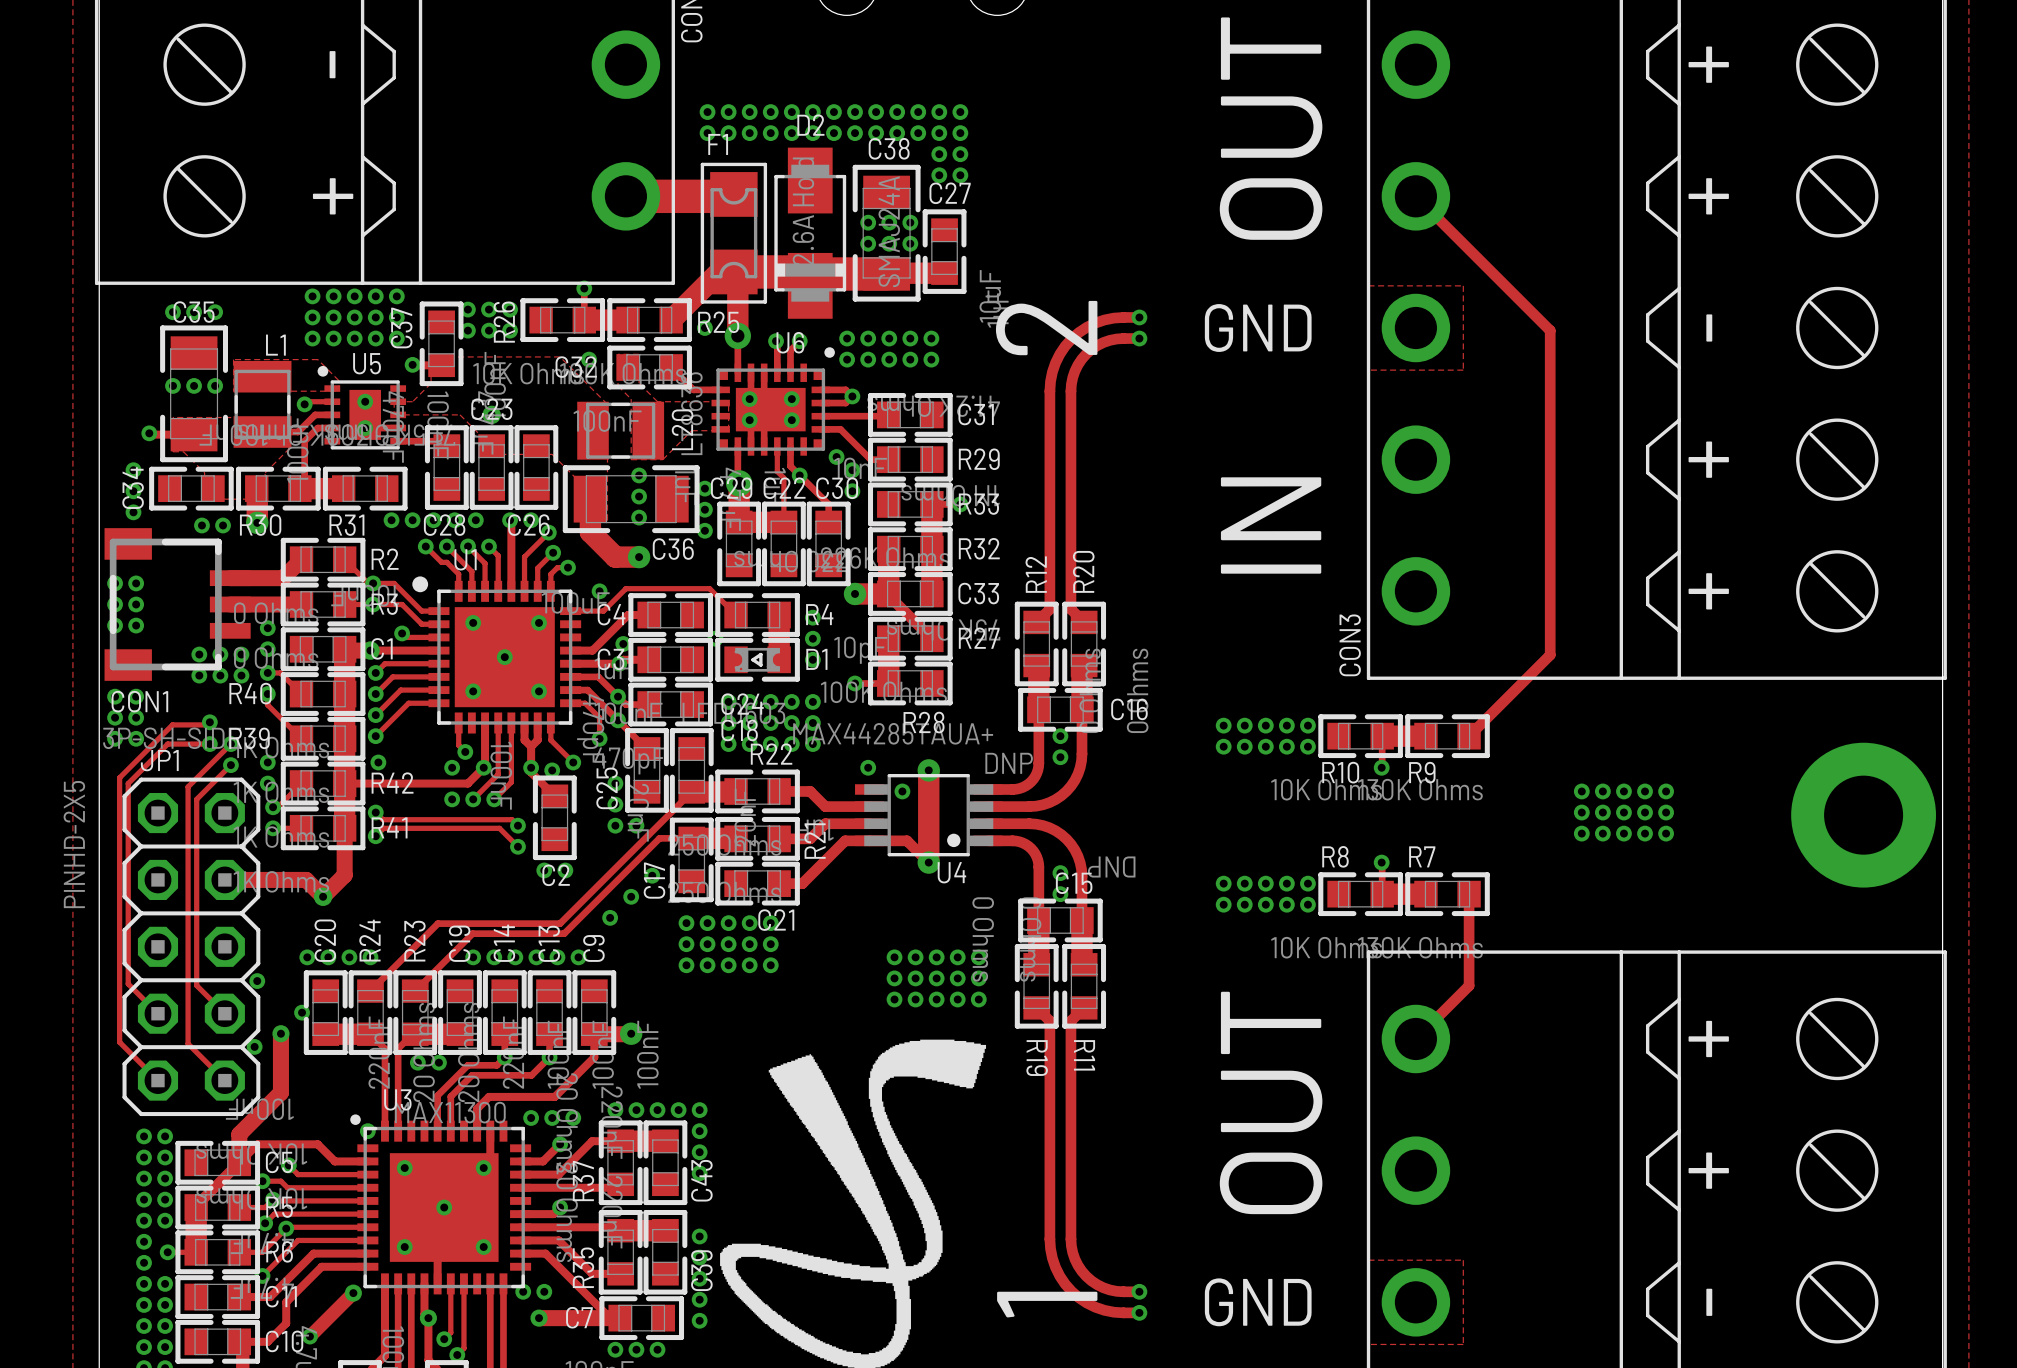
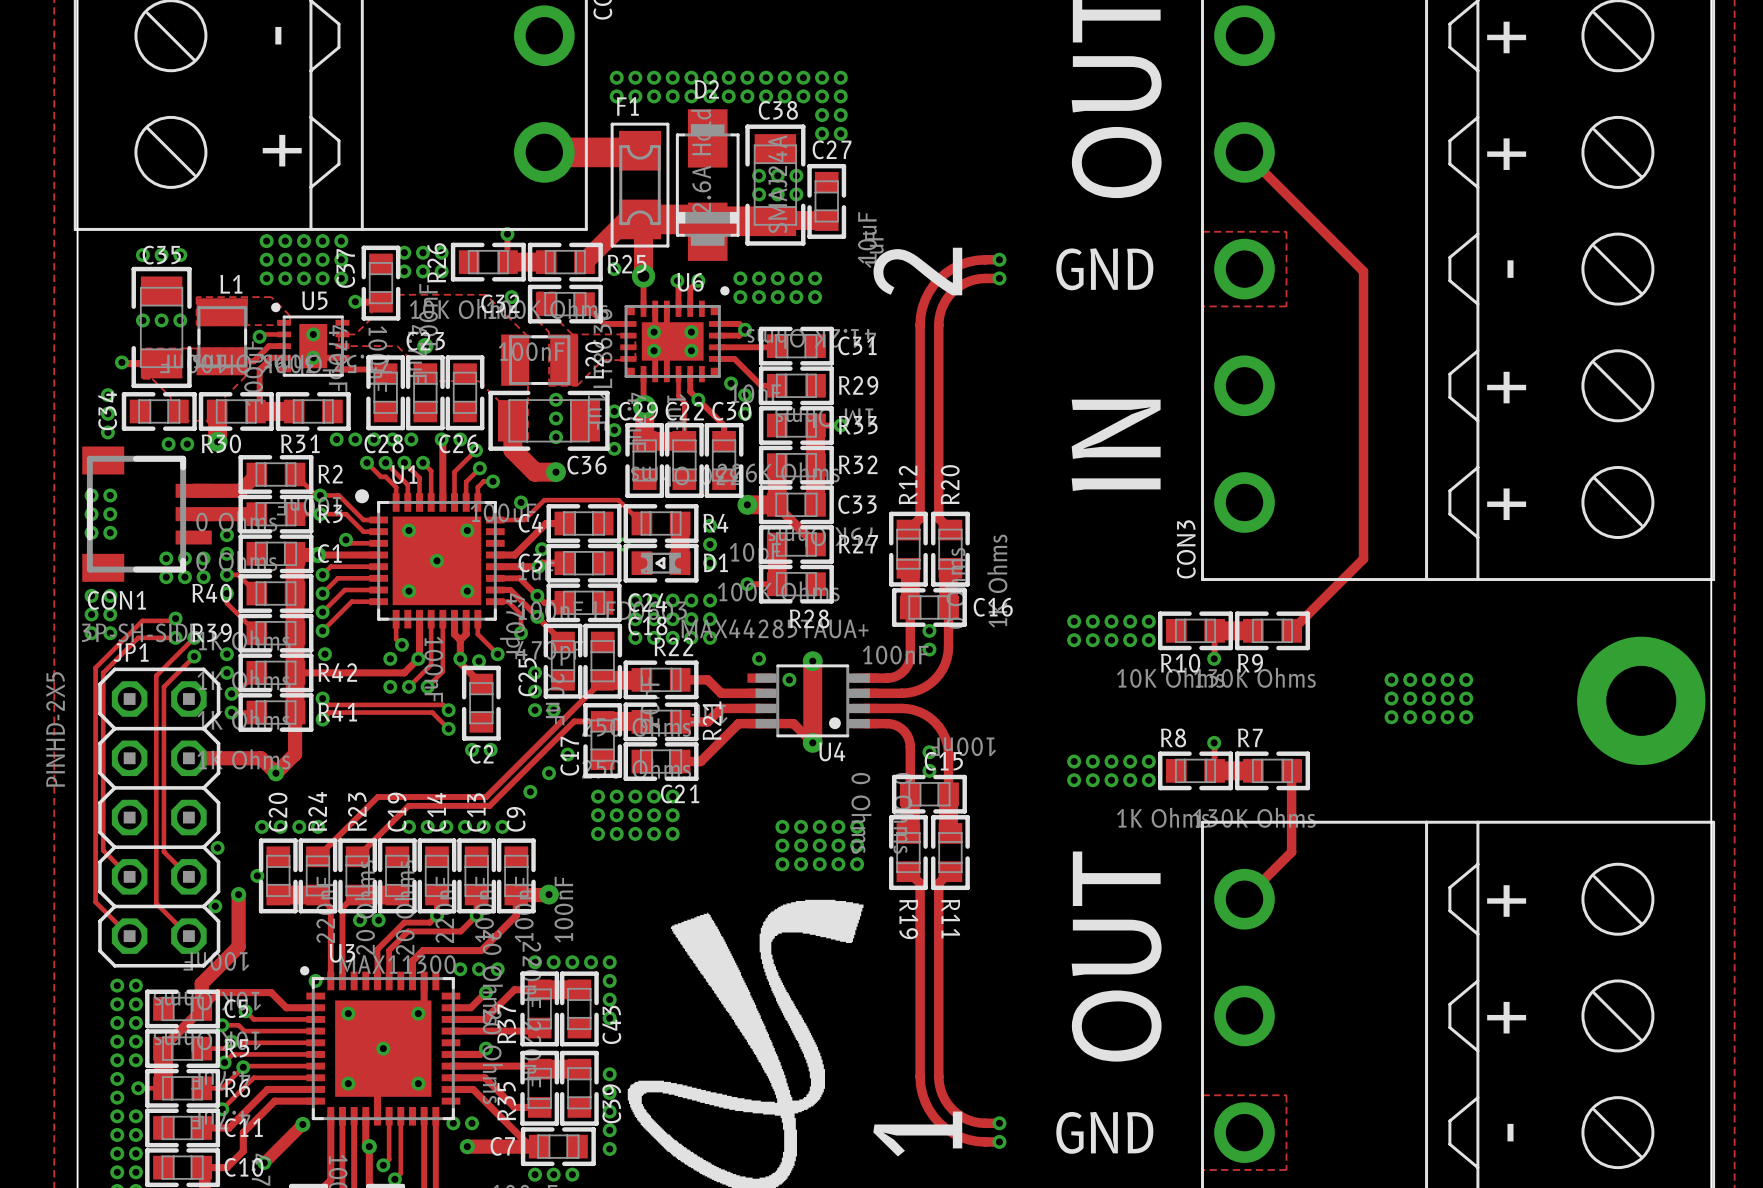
R20 value: 0 Ohms (1137, 690) -> 1K Ohms (997, 581)
C16 value: DNP (1009, 763) -> 100nF (895, 655)
C15 value: DNP (1111, 867) -> 100nF (963, 746)
R8 value: 10K Ohms (1326, 947) -> 1K Ohms (1163, 817)

